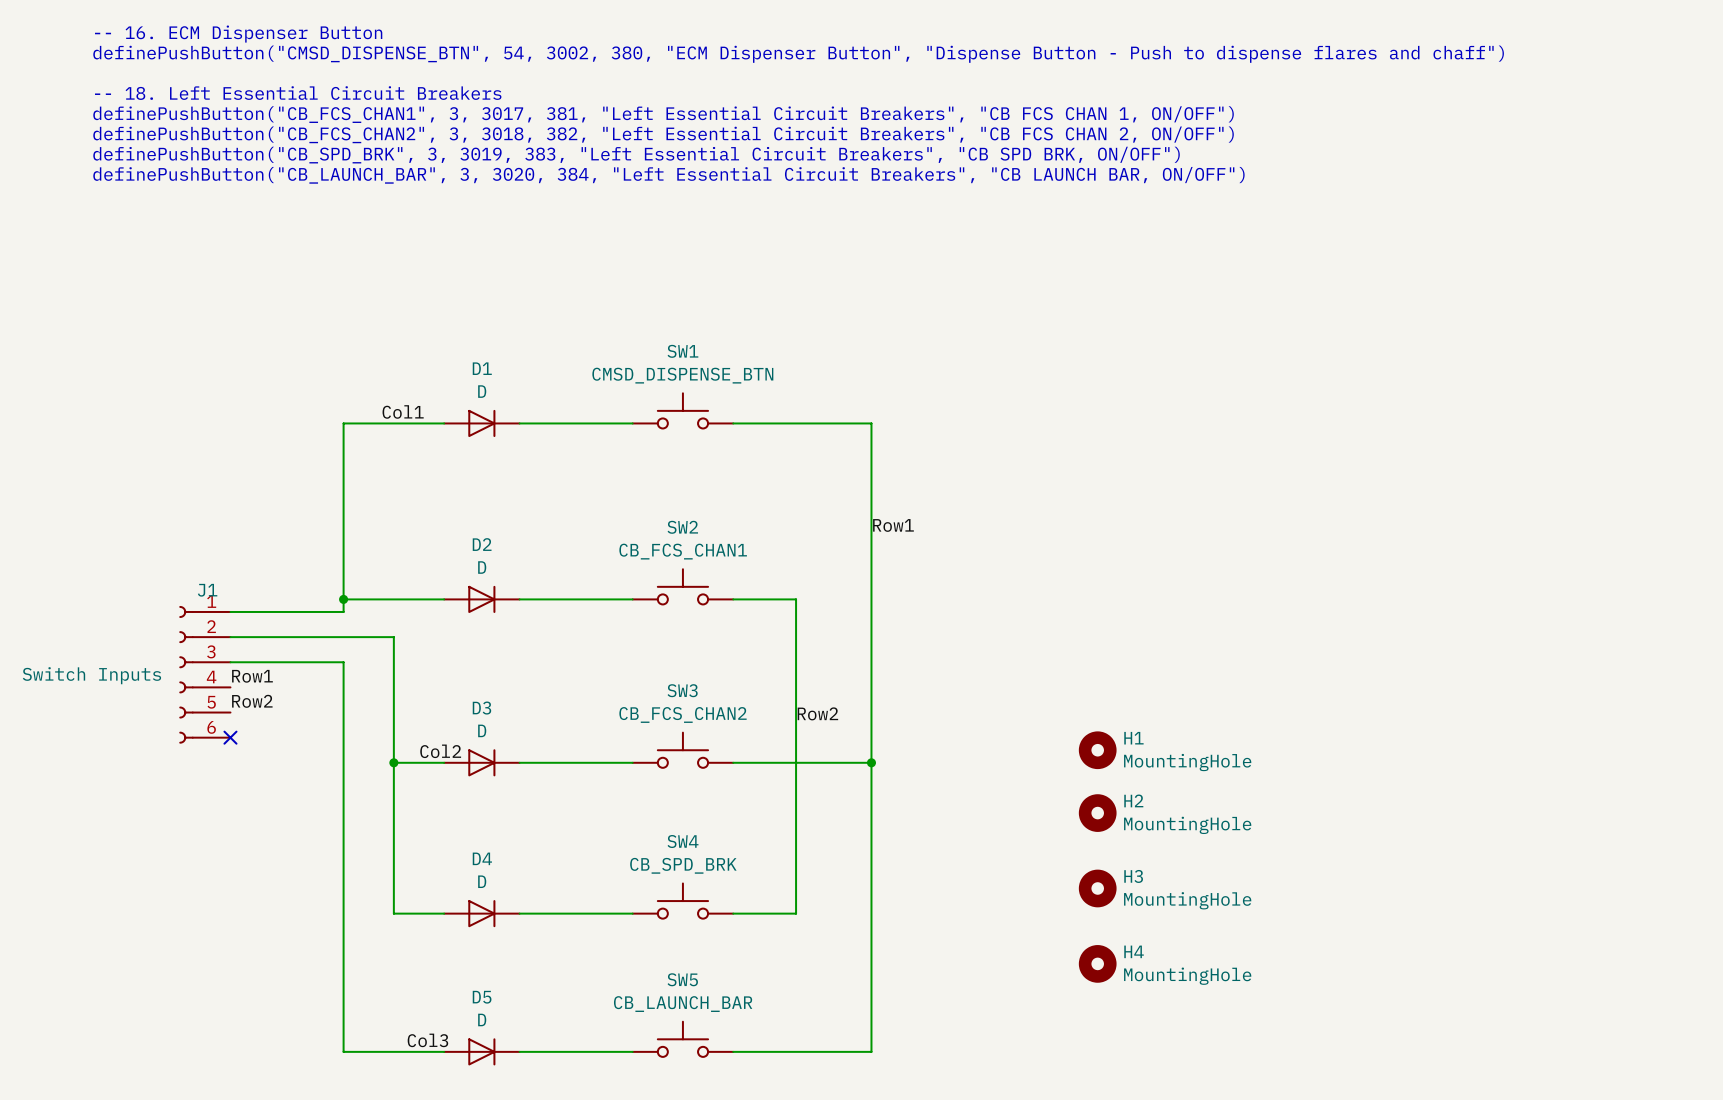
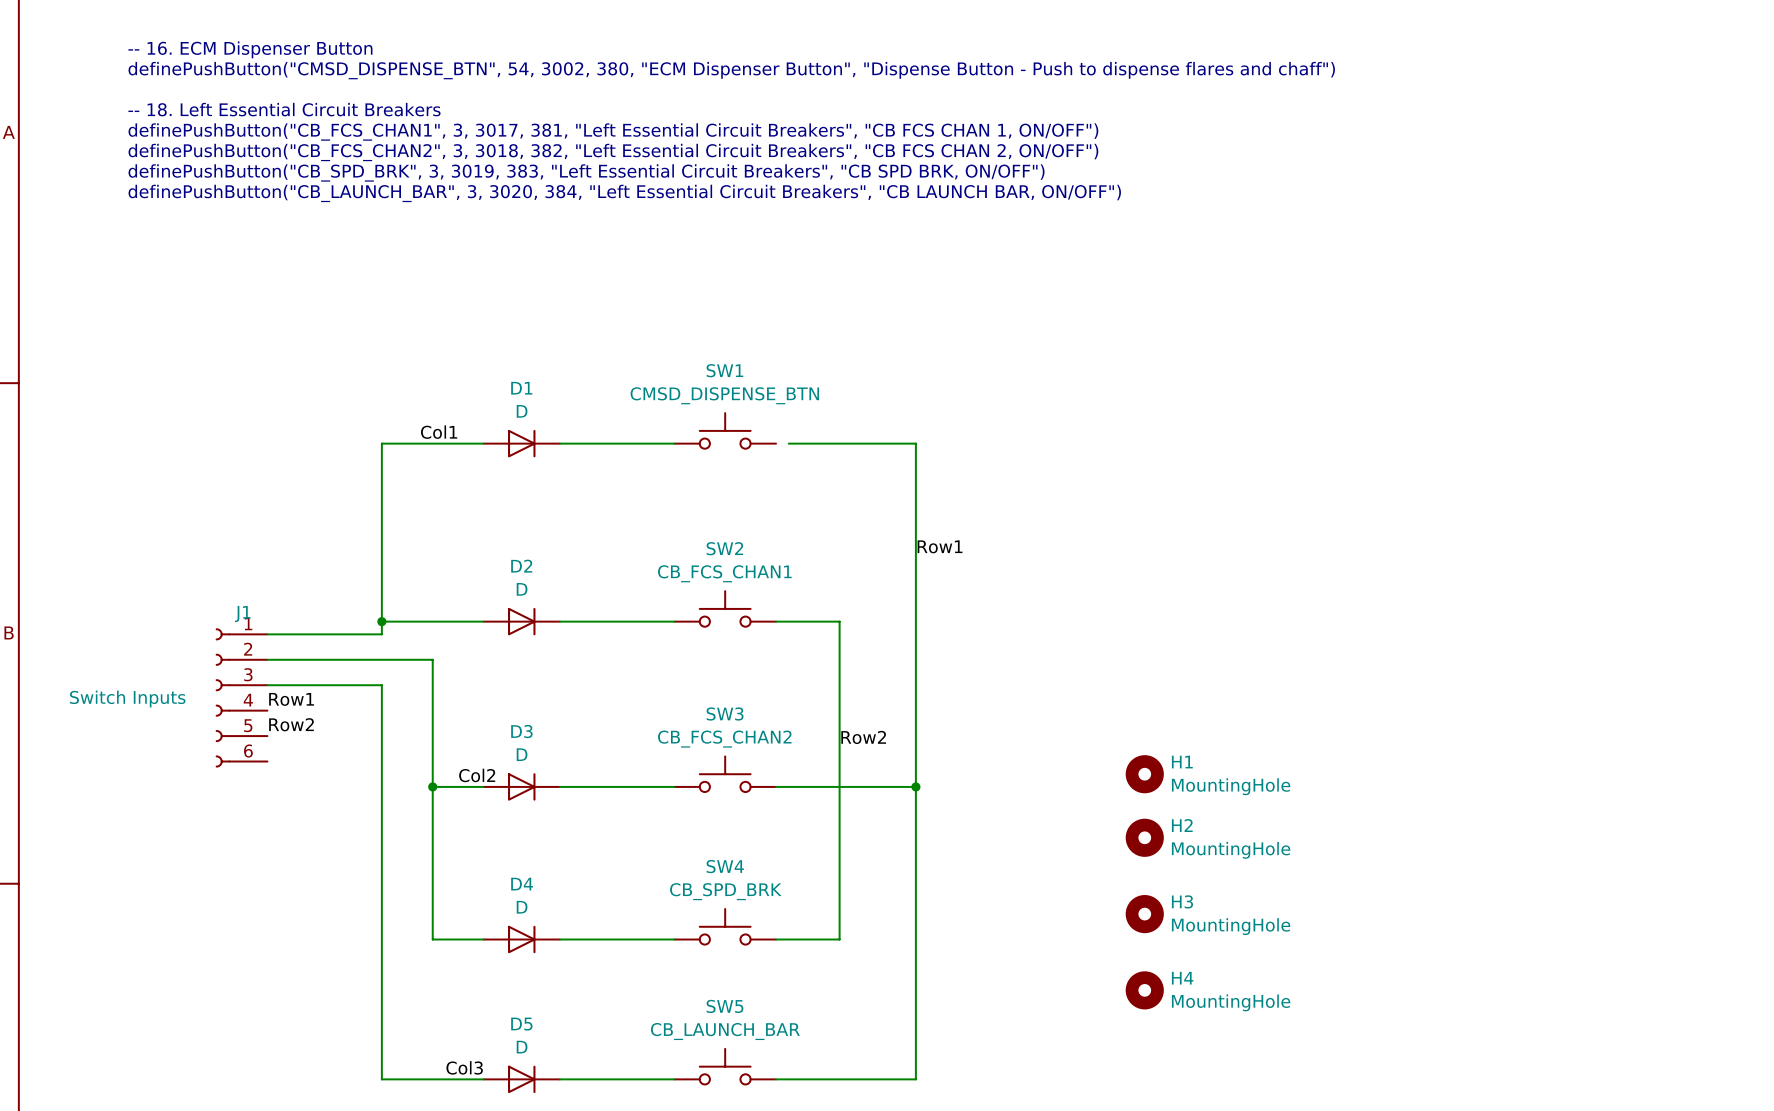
wire: (733, 423) (745, 423) -> none
no-connect mark: (230, 737) -> none

